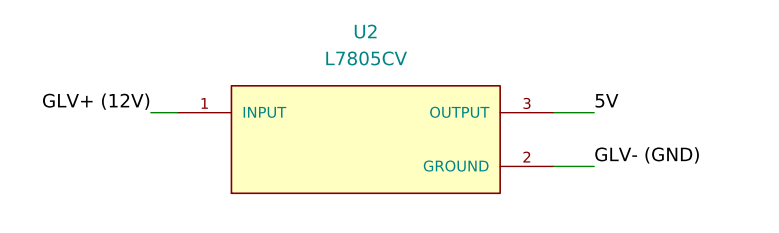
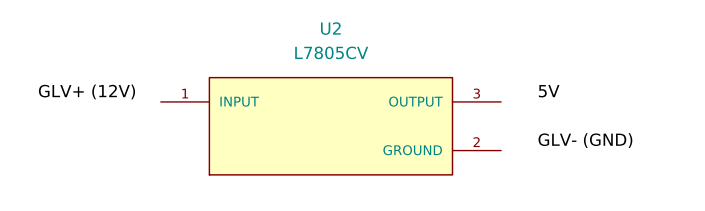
wire: (150, 112) (177, 112) -> none
wire: (553, 112) (594, 112) -> none
wire: (553, 166) (594, 166) -> none

